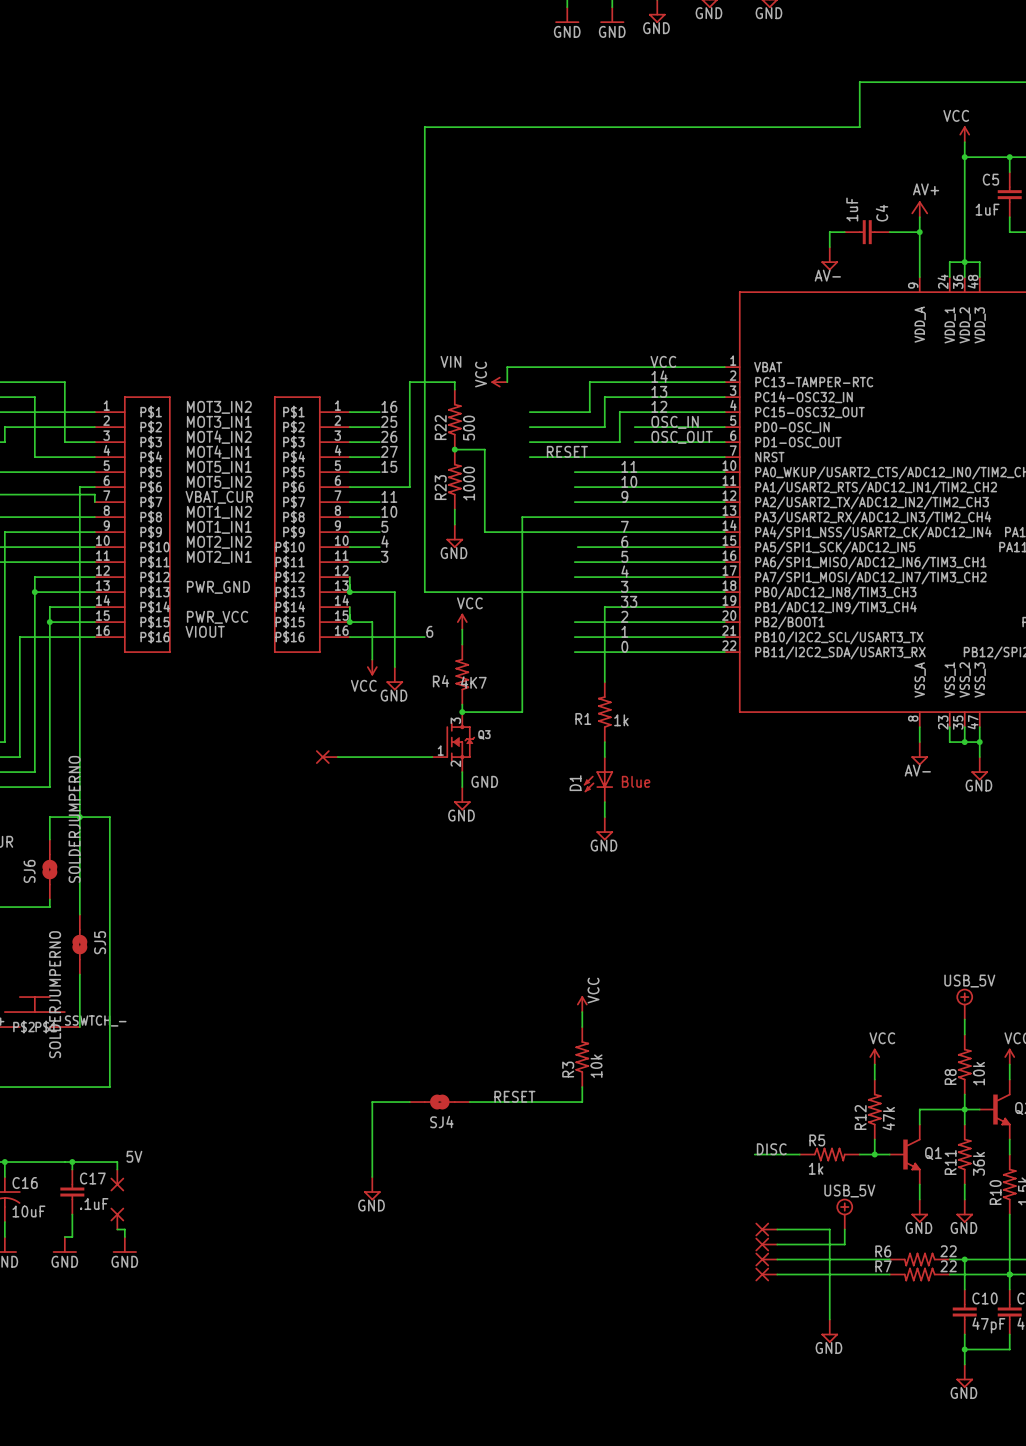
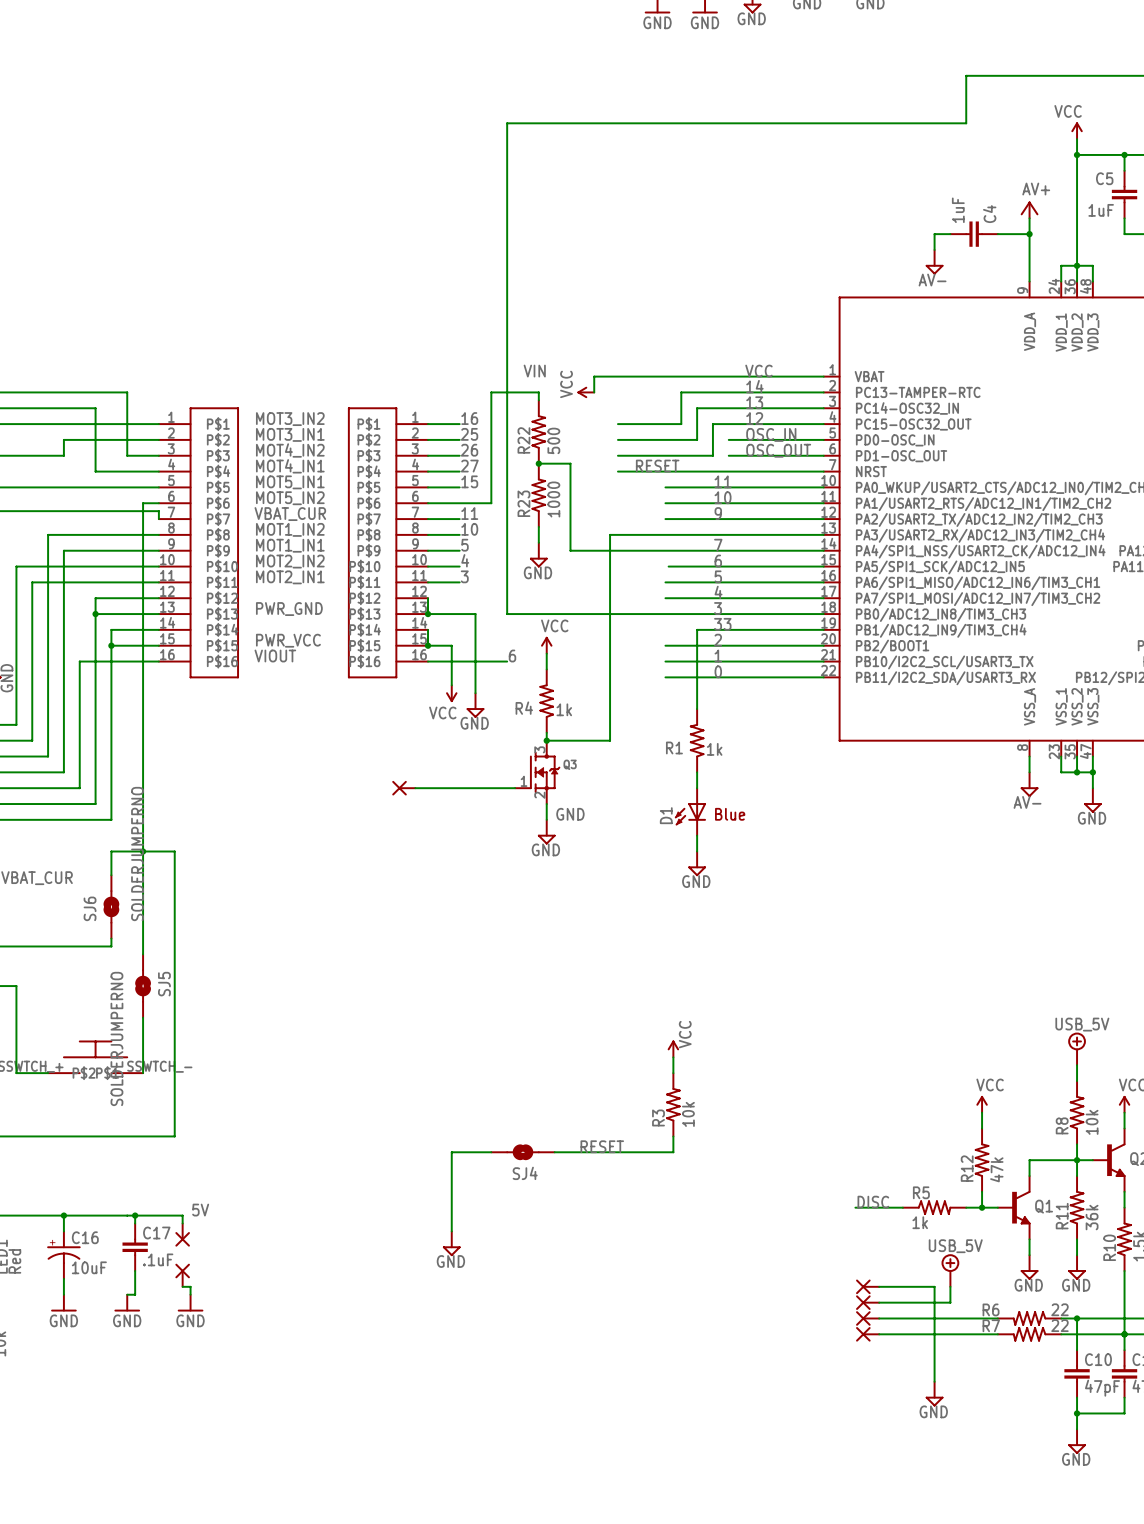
R4 value: 4K7 (473, 682) -> 1k (564, 709)

